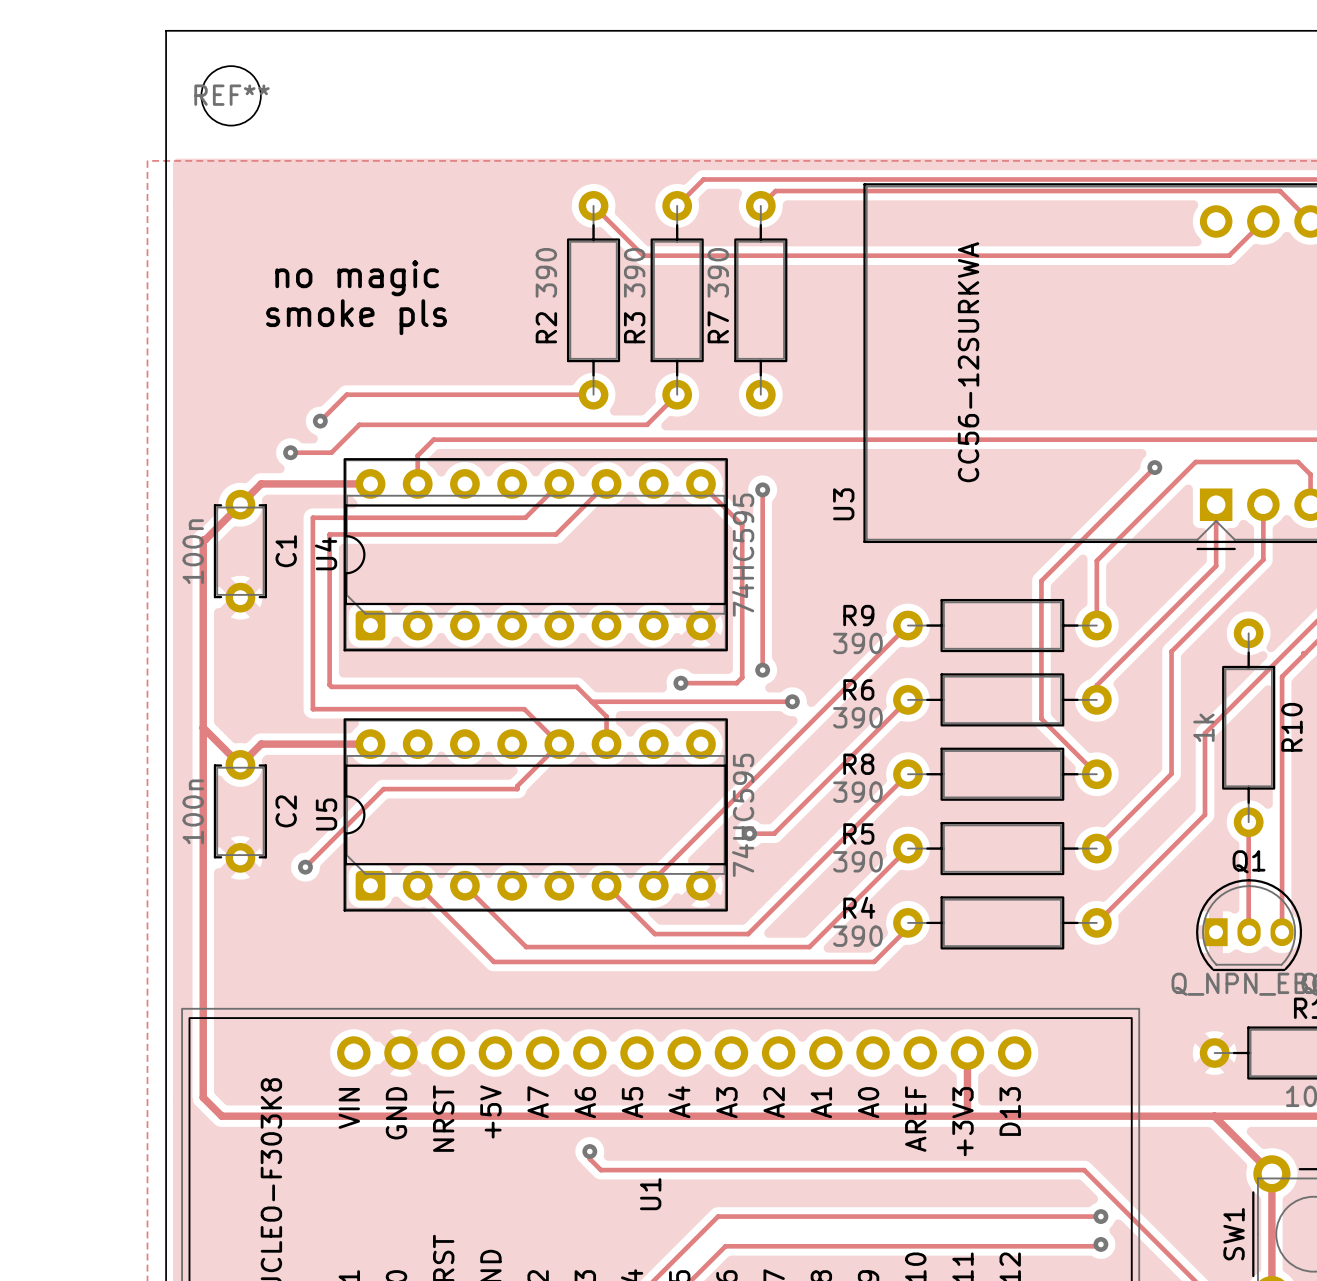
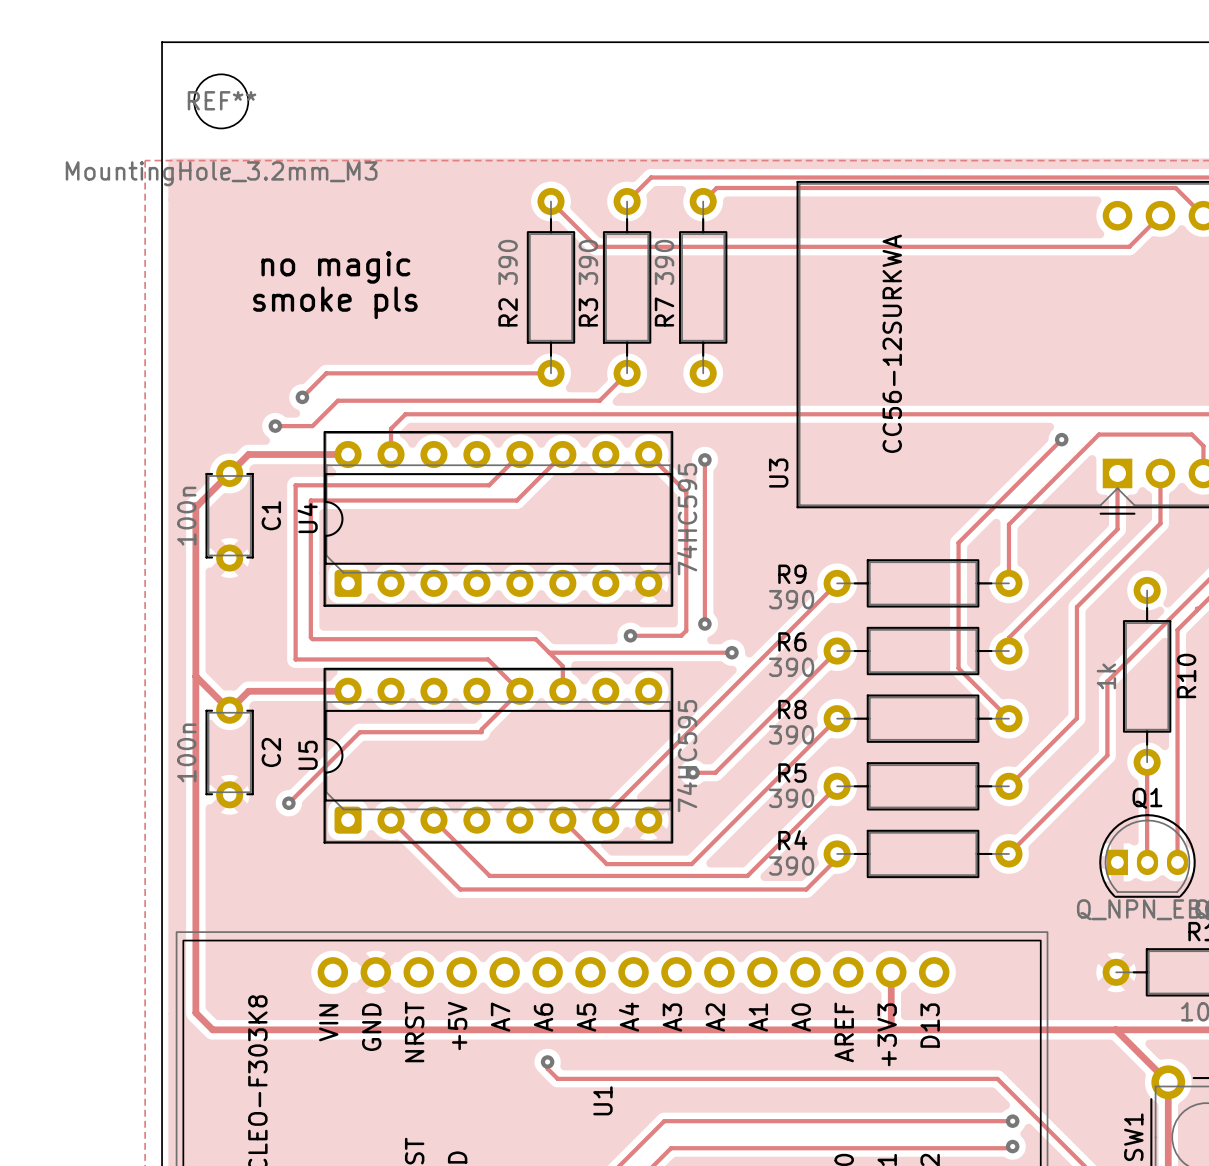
REF** value: none -> MountingHole_3.2mm_M3 (221, 173)

